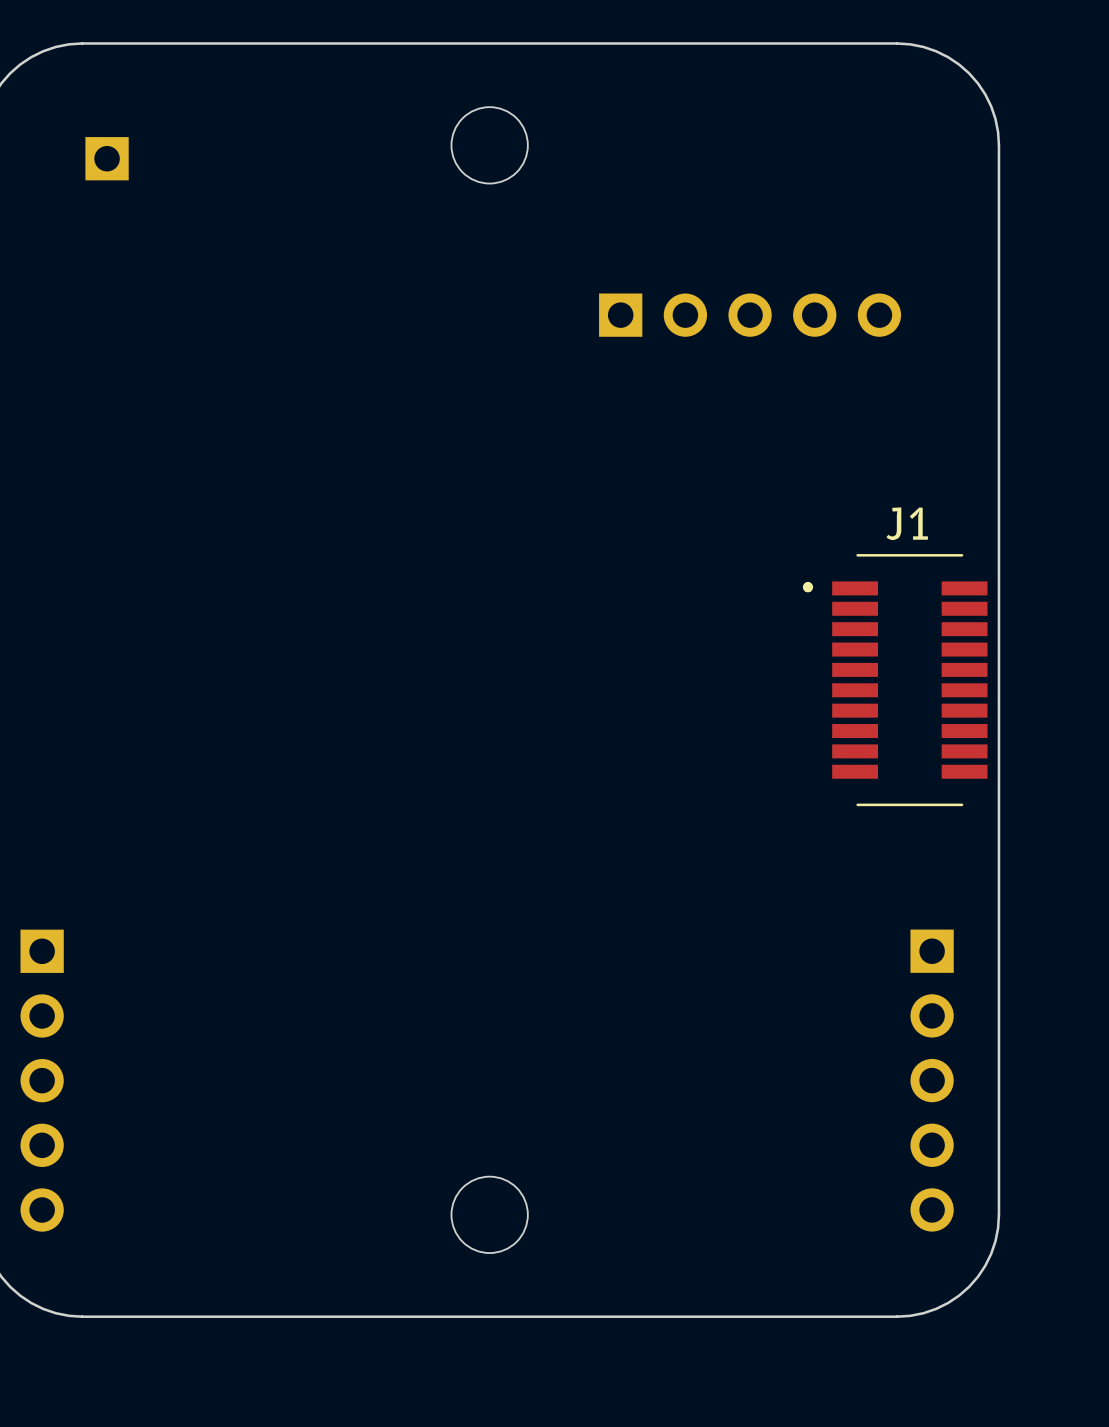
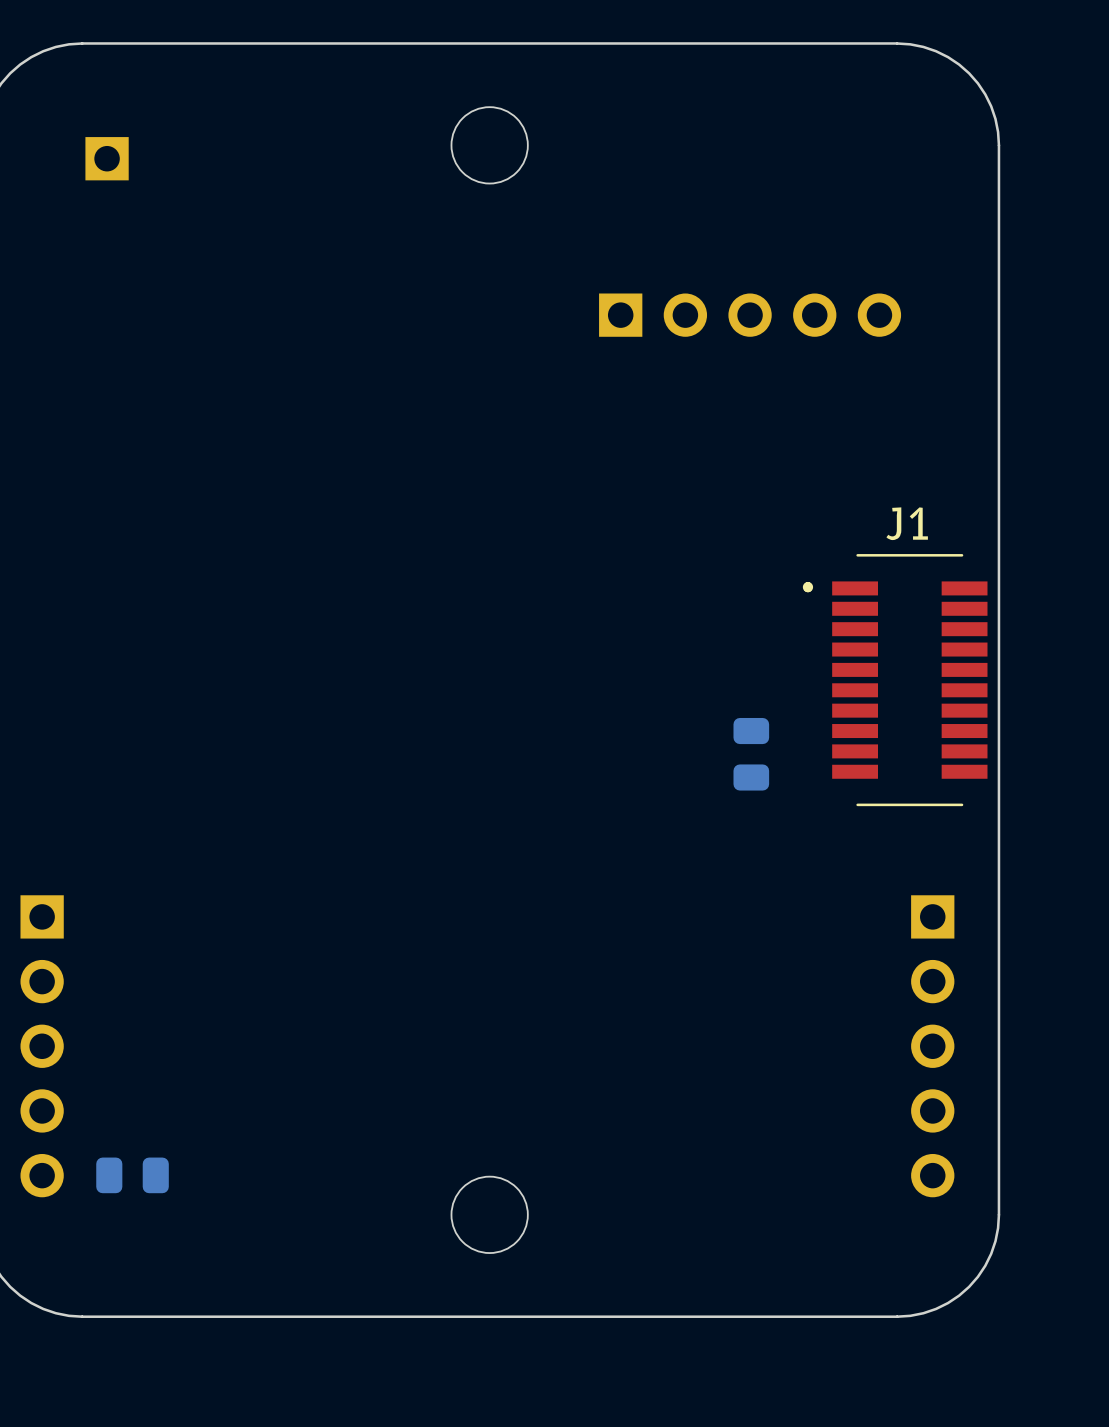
part: none -> (751, 754)
part position: (42, 1080) -> (42, 1046)
part position: (932, 1080) -> (932, 1046)
part: none -> (132, 1175)

